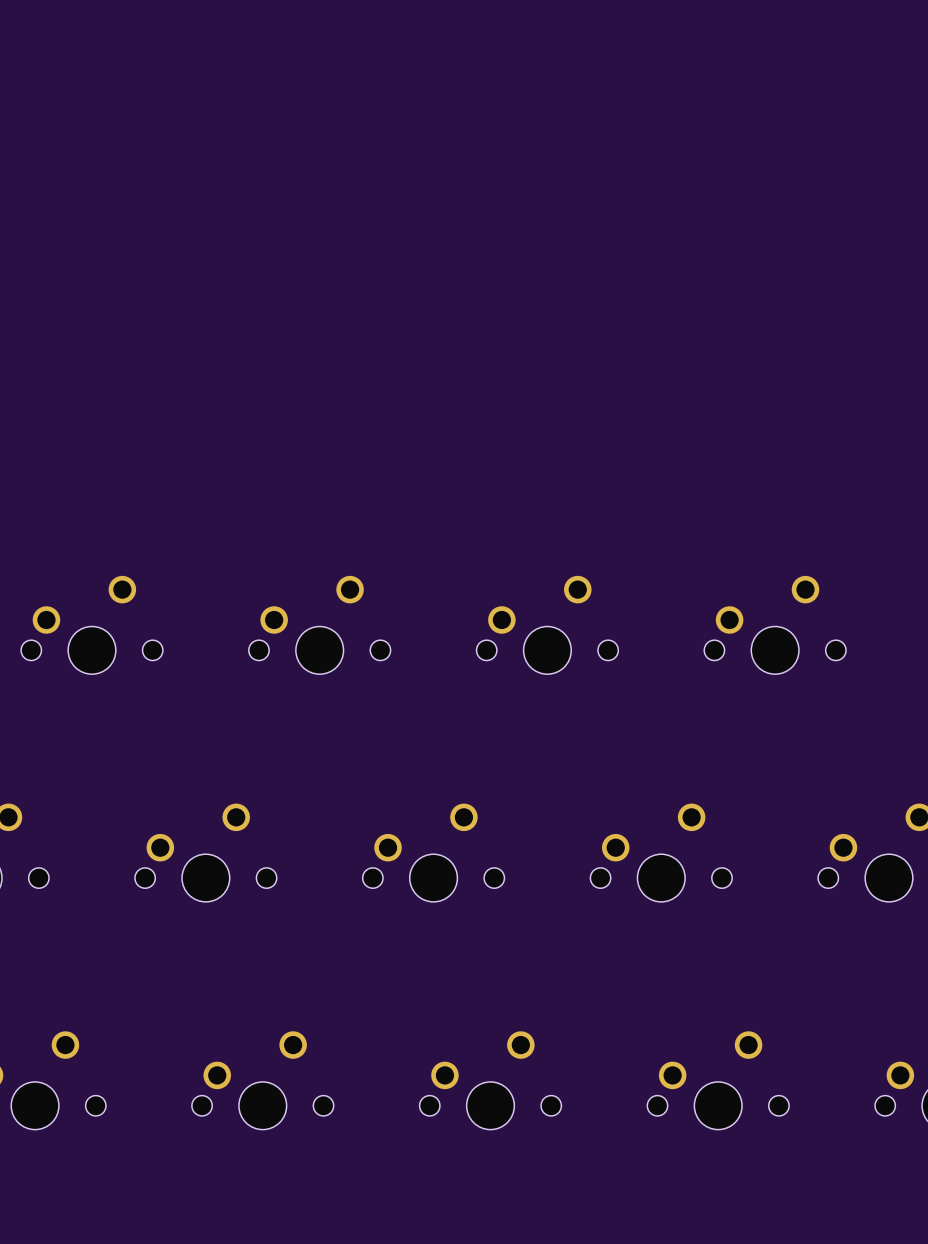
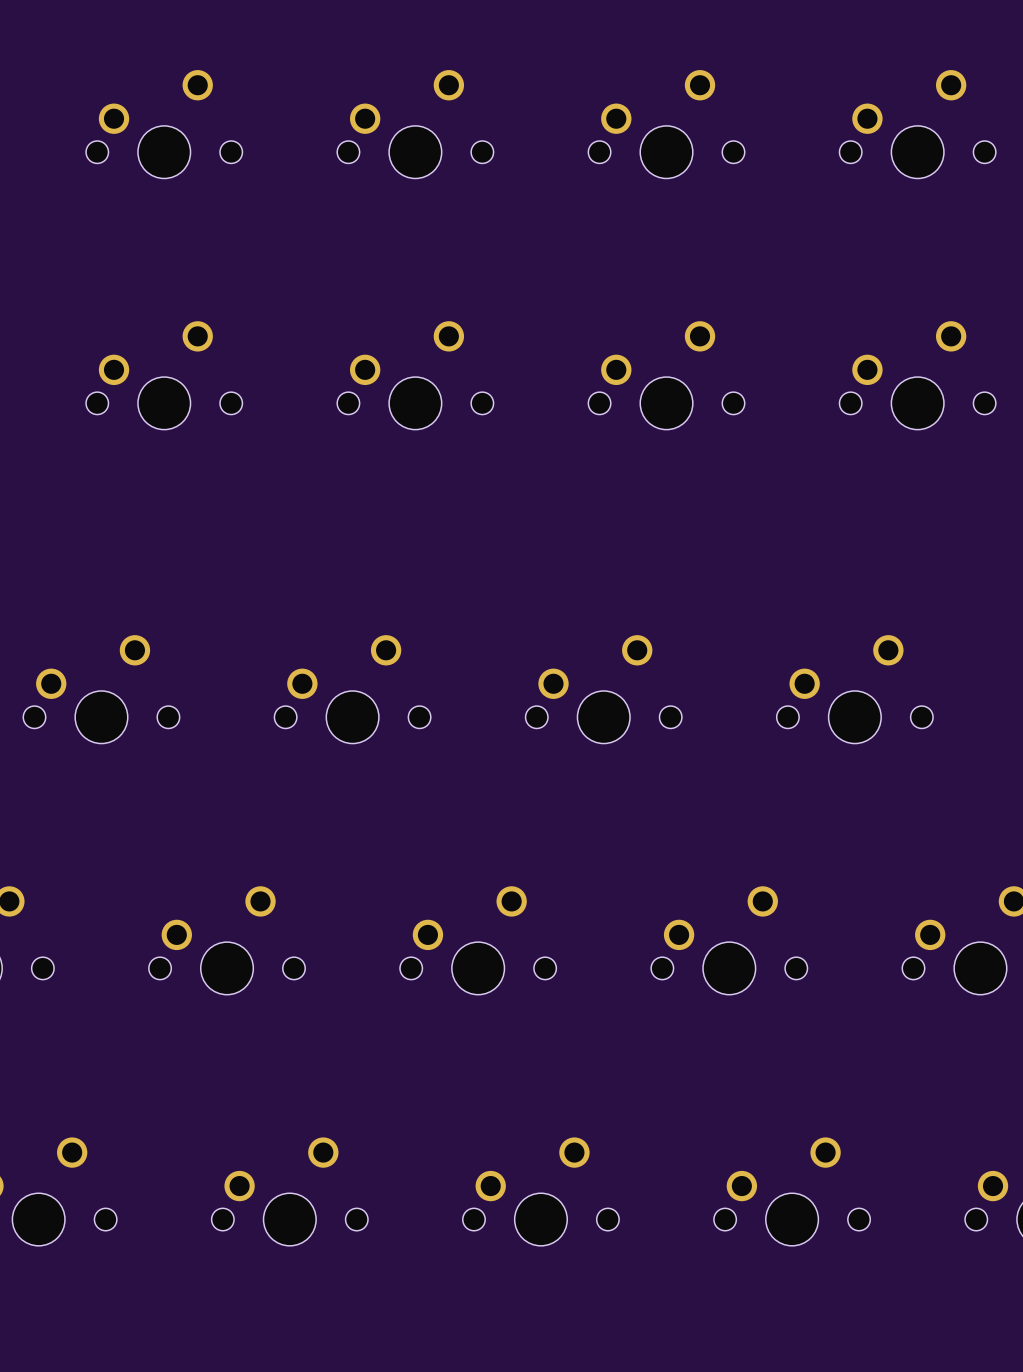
part: none -> (164, 124)
part: none -> (415, 124)
part: none -> (666, 124)
part: none -> (917, 124)
part: none -> (164, 375)
part: none -> (415, 375)
part: none -> (666, 375)
part: none -> (917, 375)

